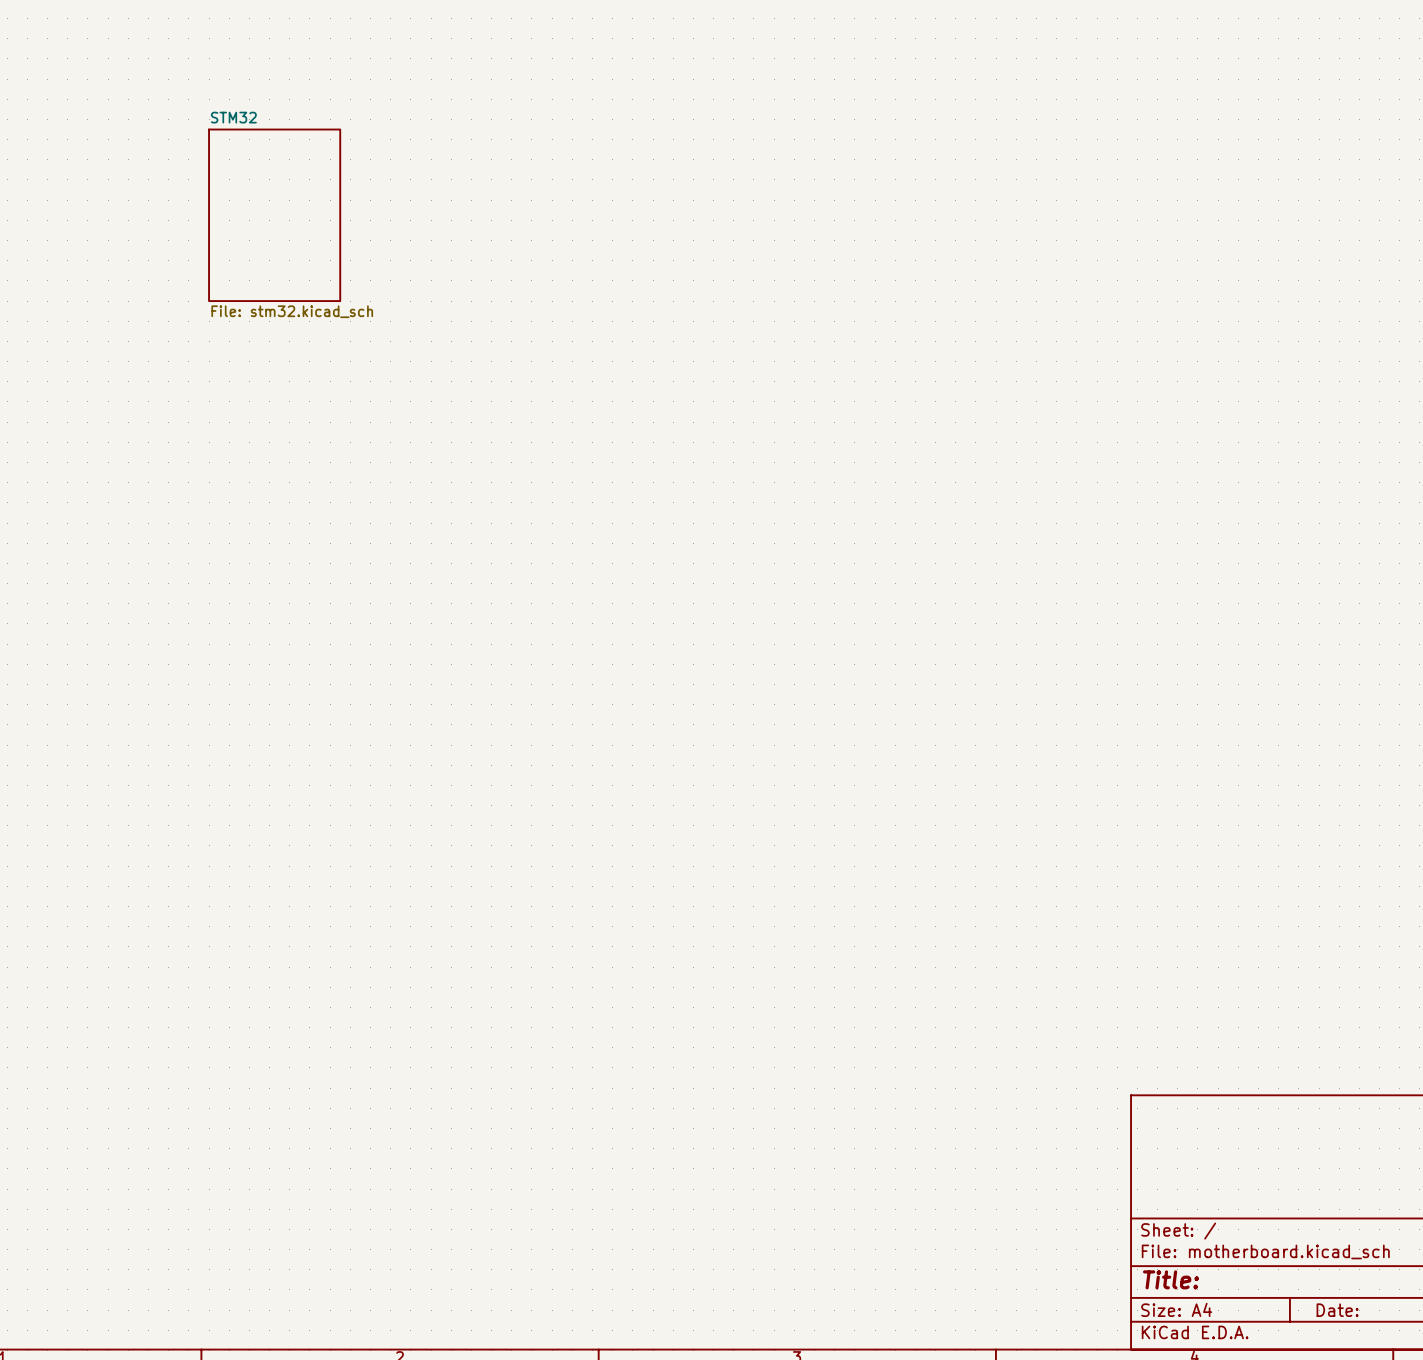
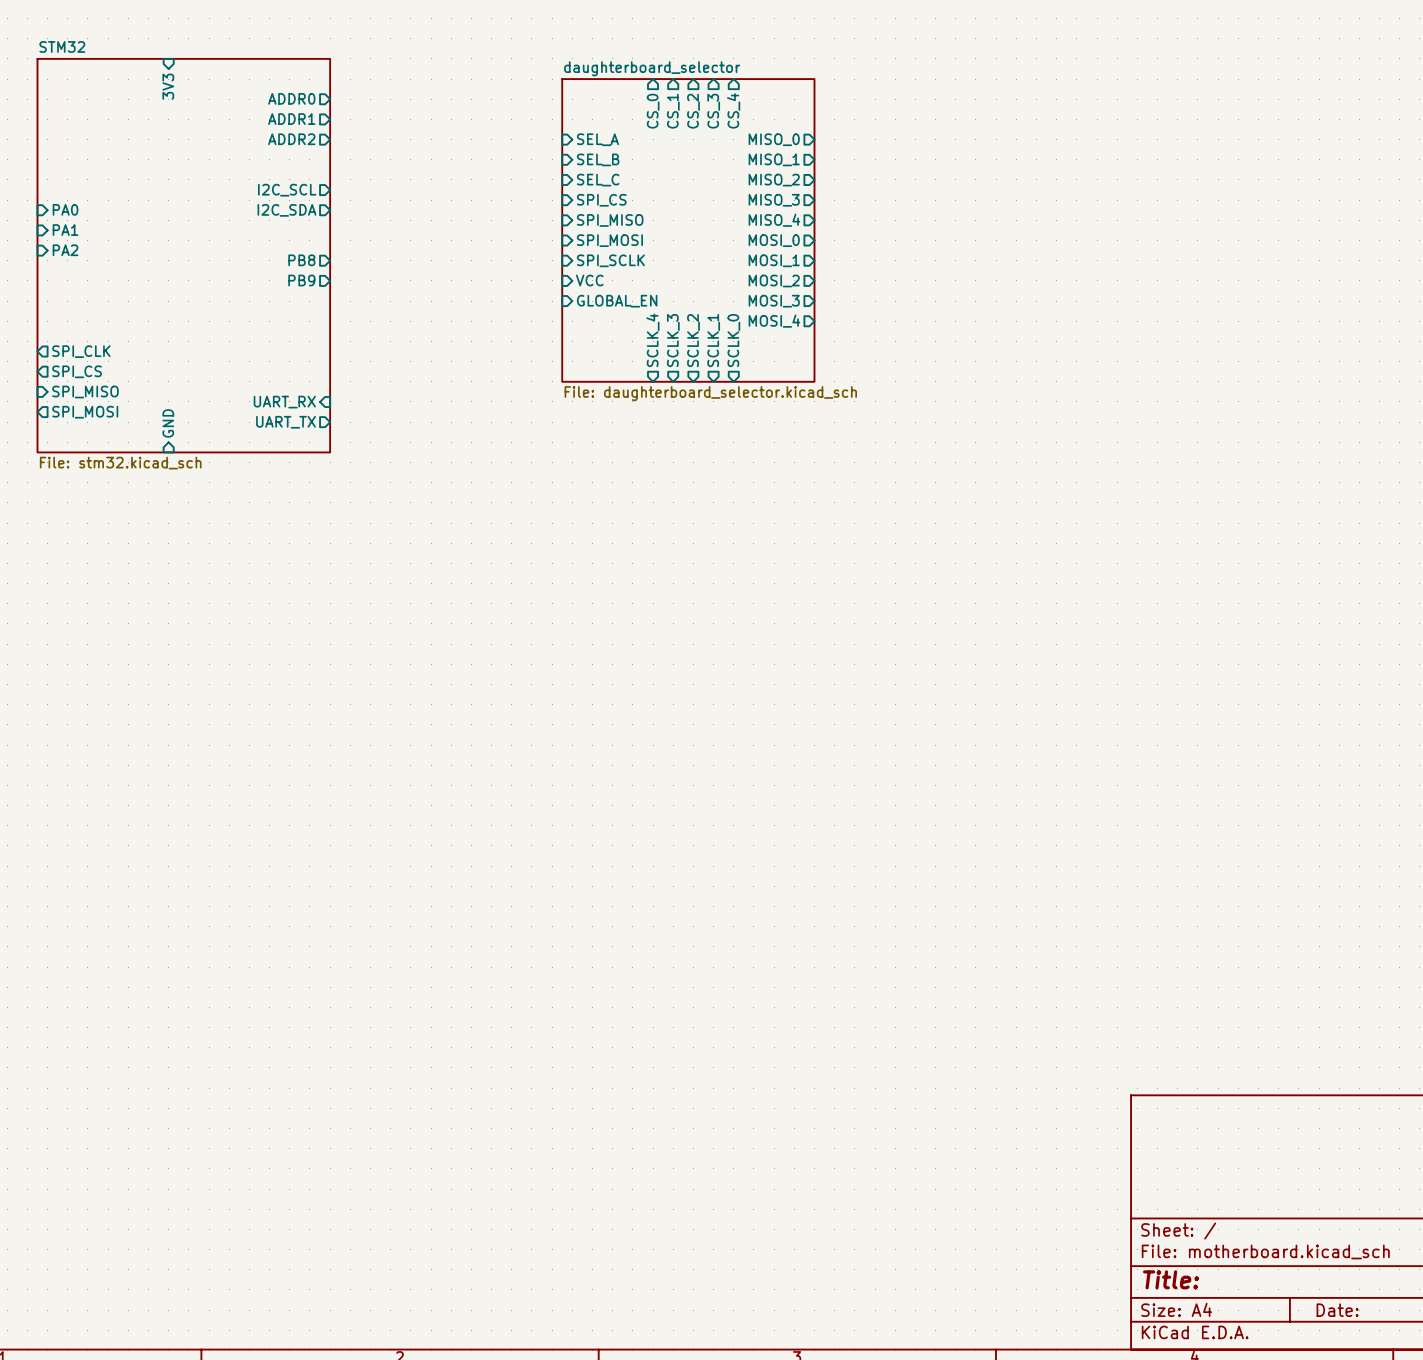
sheet pin: none -> 3V3 (168, 86)
sheet pin: none -> ADDR0 (291, 98)
sheet pin: none -> CS_4 (733, 110)
sheet pin: none -> CS_0 (653, 111)
sheet pin: none -> CS_1 (673, 111)
sheet pin: none -> CS_2 (693, 111)
sheet pin: none -> CS_3 (713, 111)
sheet STM32 name position: STM32 (233, 117) -> STM32 (62, 46)
sheet pin: none -> ADDR1 (291, 119)
sheet STM32 shape: [208, 128, 341, 302] -> [36, 58, 331, 454]
sheet pin: none -> ADDR2 (291, 139)
sheet pin: none -> SEL_A (597, 139)
sheet pin: none -> MISO_0 (774, 139)
sheet pin: none -> SEL_B (598, 159)
sheet pin: none -> MISO_1 (774, 159)
sheet pin: none -> SEL_C (598, 180)
sheet pin: none -> MISO_2 (774, 180)
sheet pin: none -> I2C_SCL (287, 190)
sheet pin: none -> SPI_CS (601, 200)
sheet pin: none -> MISO_3 (774, 200)
sheet pin: none -> PA0 (65, 209)
sheet pin: none -> I2C_SDA (286, 210)
sheet pin: none -> SPI_MISO (610, 220)
sheet pin: none -> MISO_4 (774, 220)
sheet pin: none -> PA1 (65, 230)
sheet daughterboard_selector: none -> File: daughterboard_selector.kicad_sch (688, 230)
sheet pin: none -> SPI_MOSI (609, 240)
sheet pin: none -> MOSI_0 (774, 240)
sheet pin: none -> PA2 (65, 250)
sheet pin: none -> PB8 (301, 260)
sheet pin: none -> SPI_SCLK (610, 260)
sheet pin: none -> MOSI_1 (774, 260)
sheet pin: none -> PB9 (301, 280)
sheet pin: none -> VCC (589, 280)
sheet pin: none -> MOSI_2 (774, 280)
sheet pin: none -> GLOBAL_EN (617, 301)
sheet pin: none -> MOSI_3 (774, 301)
sheet STM32 value position: File: stm32.kicad_sch (292, 311) -> File: stm32.kicad_sch (120, 463)
sheet pin: none -> MOSI_4 (774, 321)
sheet pin: none -> SCLK_4 (652, 340)
sheet pin: none -> SCLK_3 (673, 340)
sheet pin: none -> SCLK_2 (693, 340)
sheet pin: none -> SCLK_1 (713, 340)
sheet pin: none -> SCLK_0 (733, 340)
sheet pin: none -> SPI_CLK (81, 351)
sheet pin: none -> SPI_CS (77, 371)
sheet pin: none -> SPI_MISO (85, 391)
sheet pin: none -> UART_RX (284, 402)
sheet pin: none -> SPI_MOSI (85, 412)
sheet pin: none -> UART_TX (286, 422)
sheet pin: none -> GND (168, 423)

